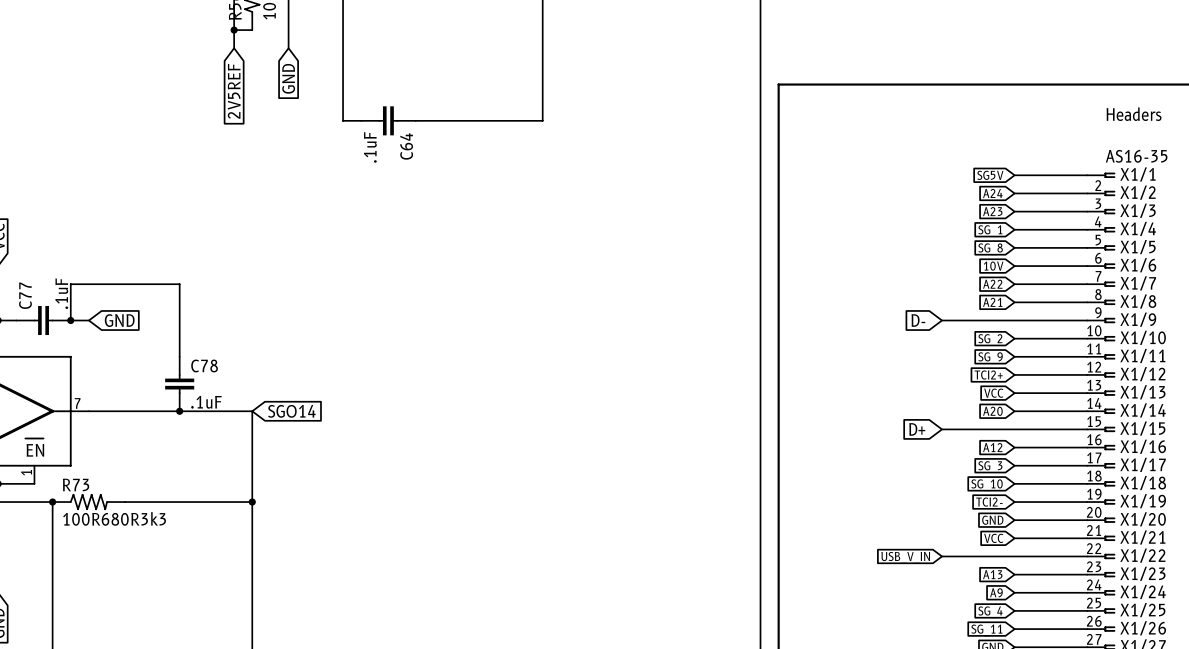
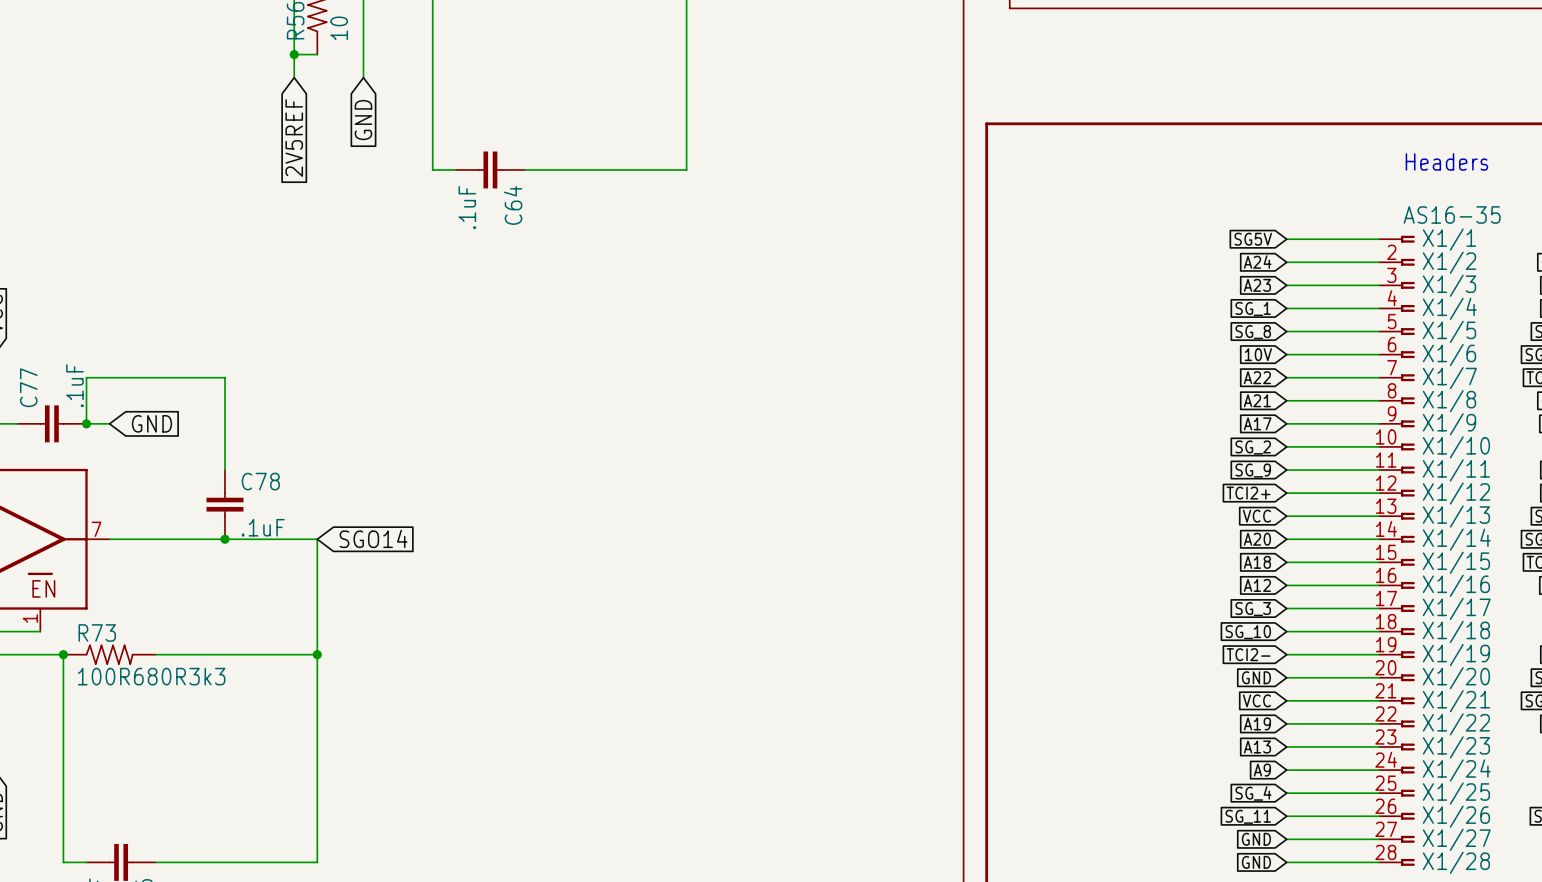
global label: D- (918, 320) -> none
wire: (942, 320) (1014, 320) -> none
global label: none -> A17 (1257, 423)
global label: D+ (917, 429) -> none
wire: (942, 429) (1014, 429) -> none
global label: none -> A18 (1257, 562)
wire: (942, 556) (1014, 556) -> none
global label: none -> A19 (1257, 723)
global label: USB_V_IN (905, 557) -> none

